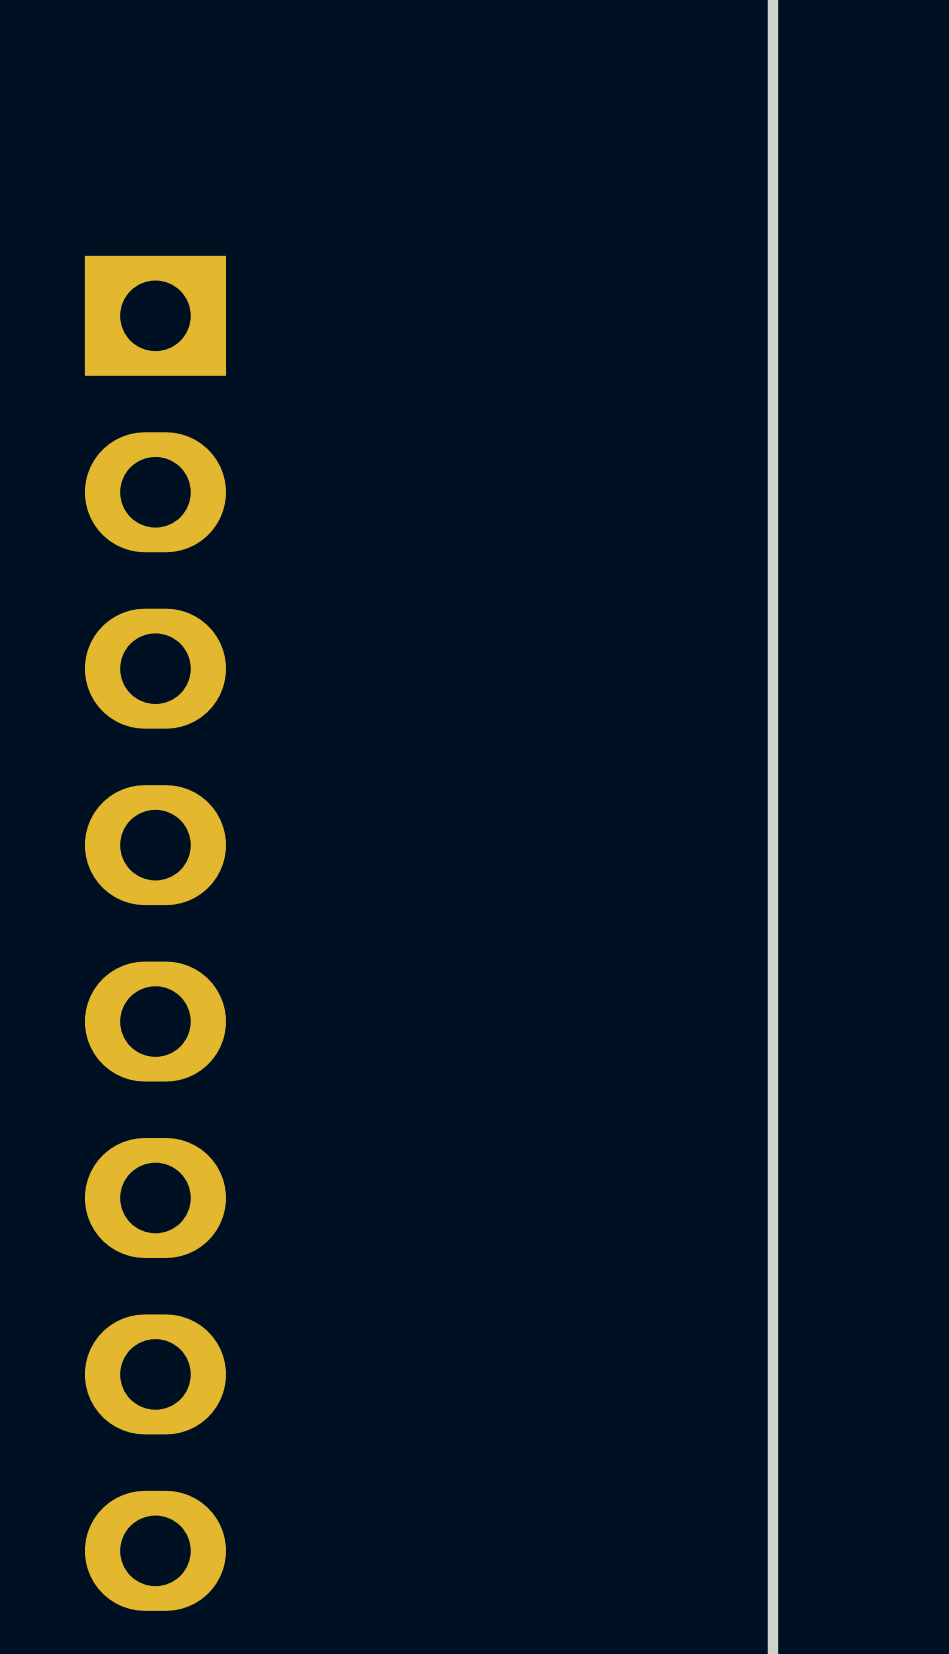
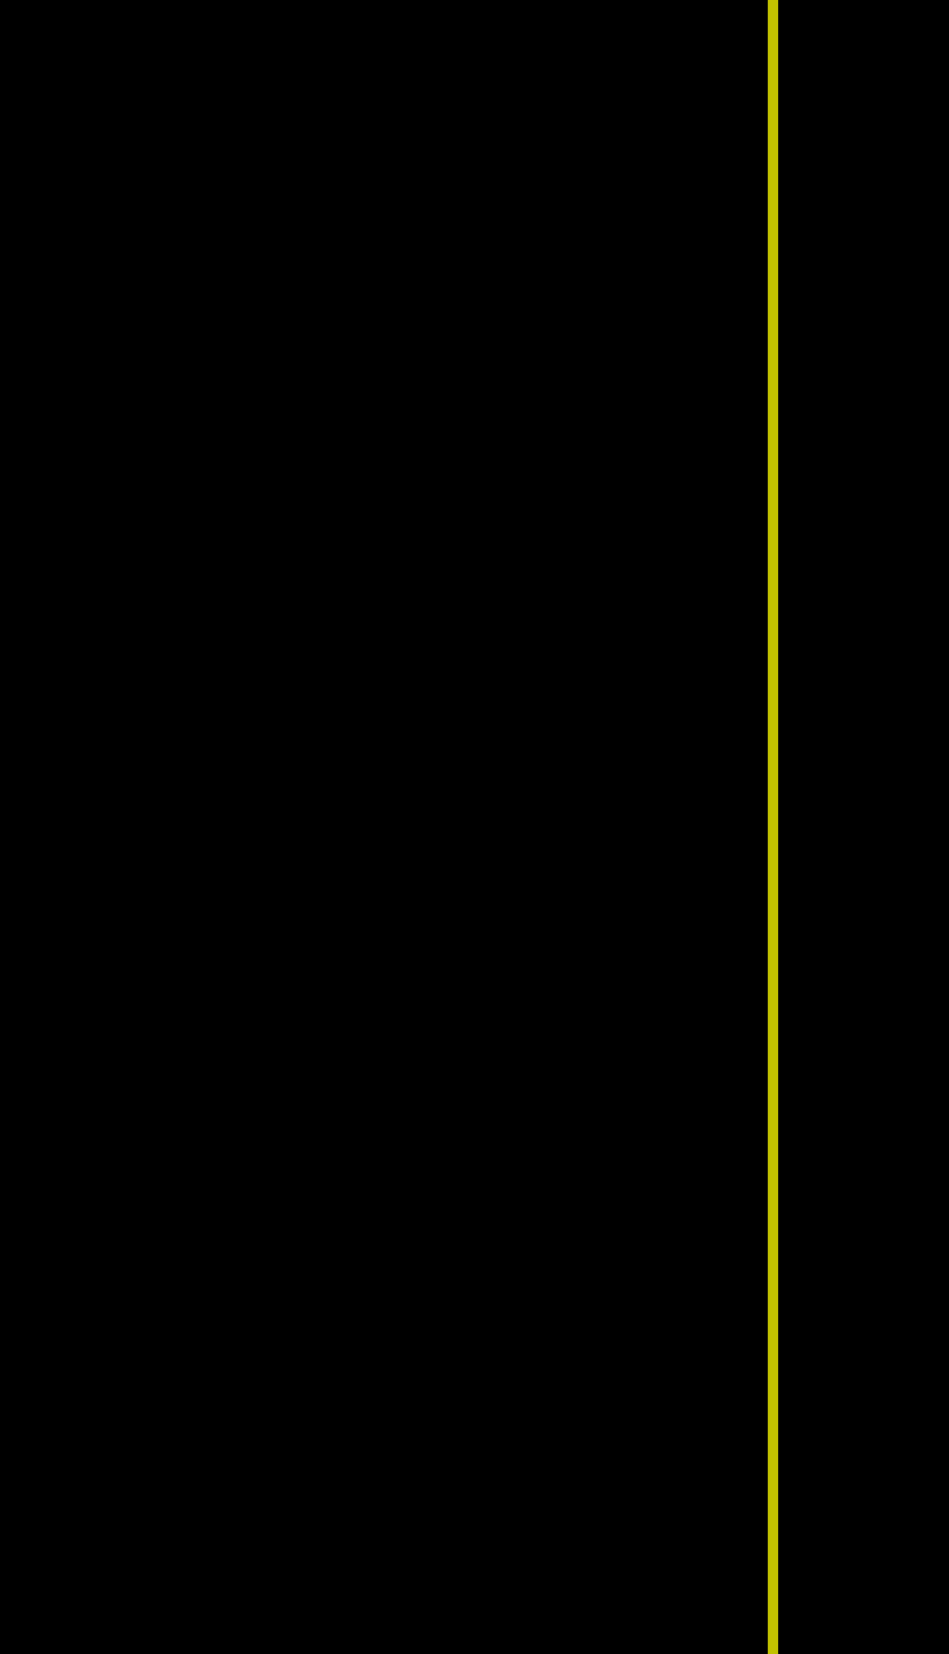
part: (155, 933) -> none

